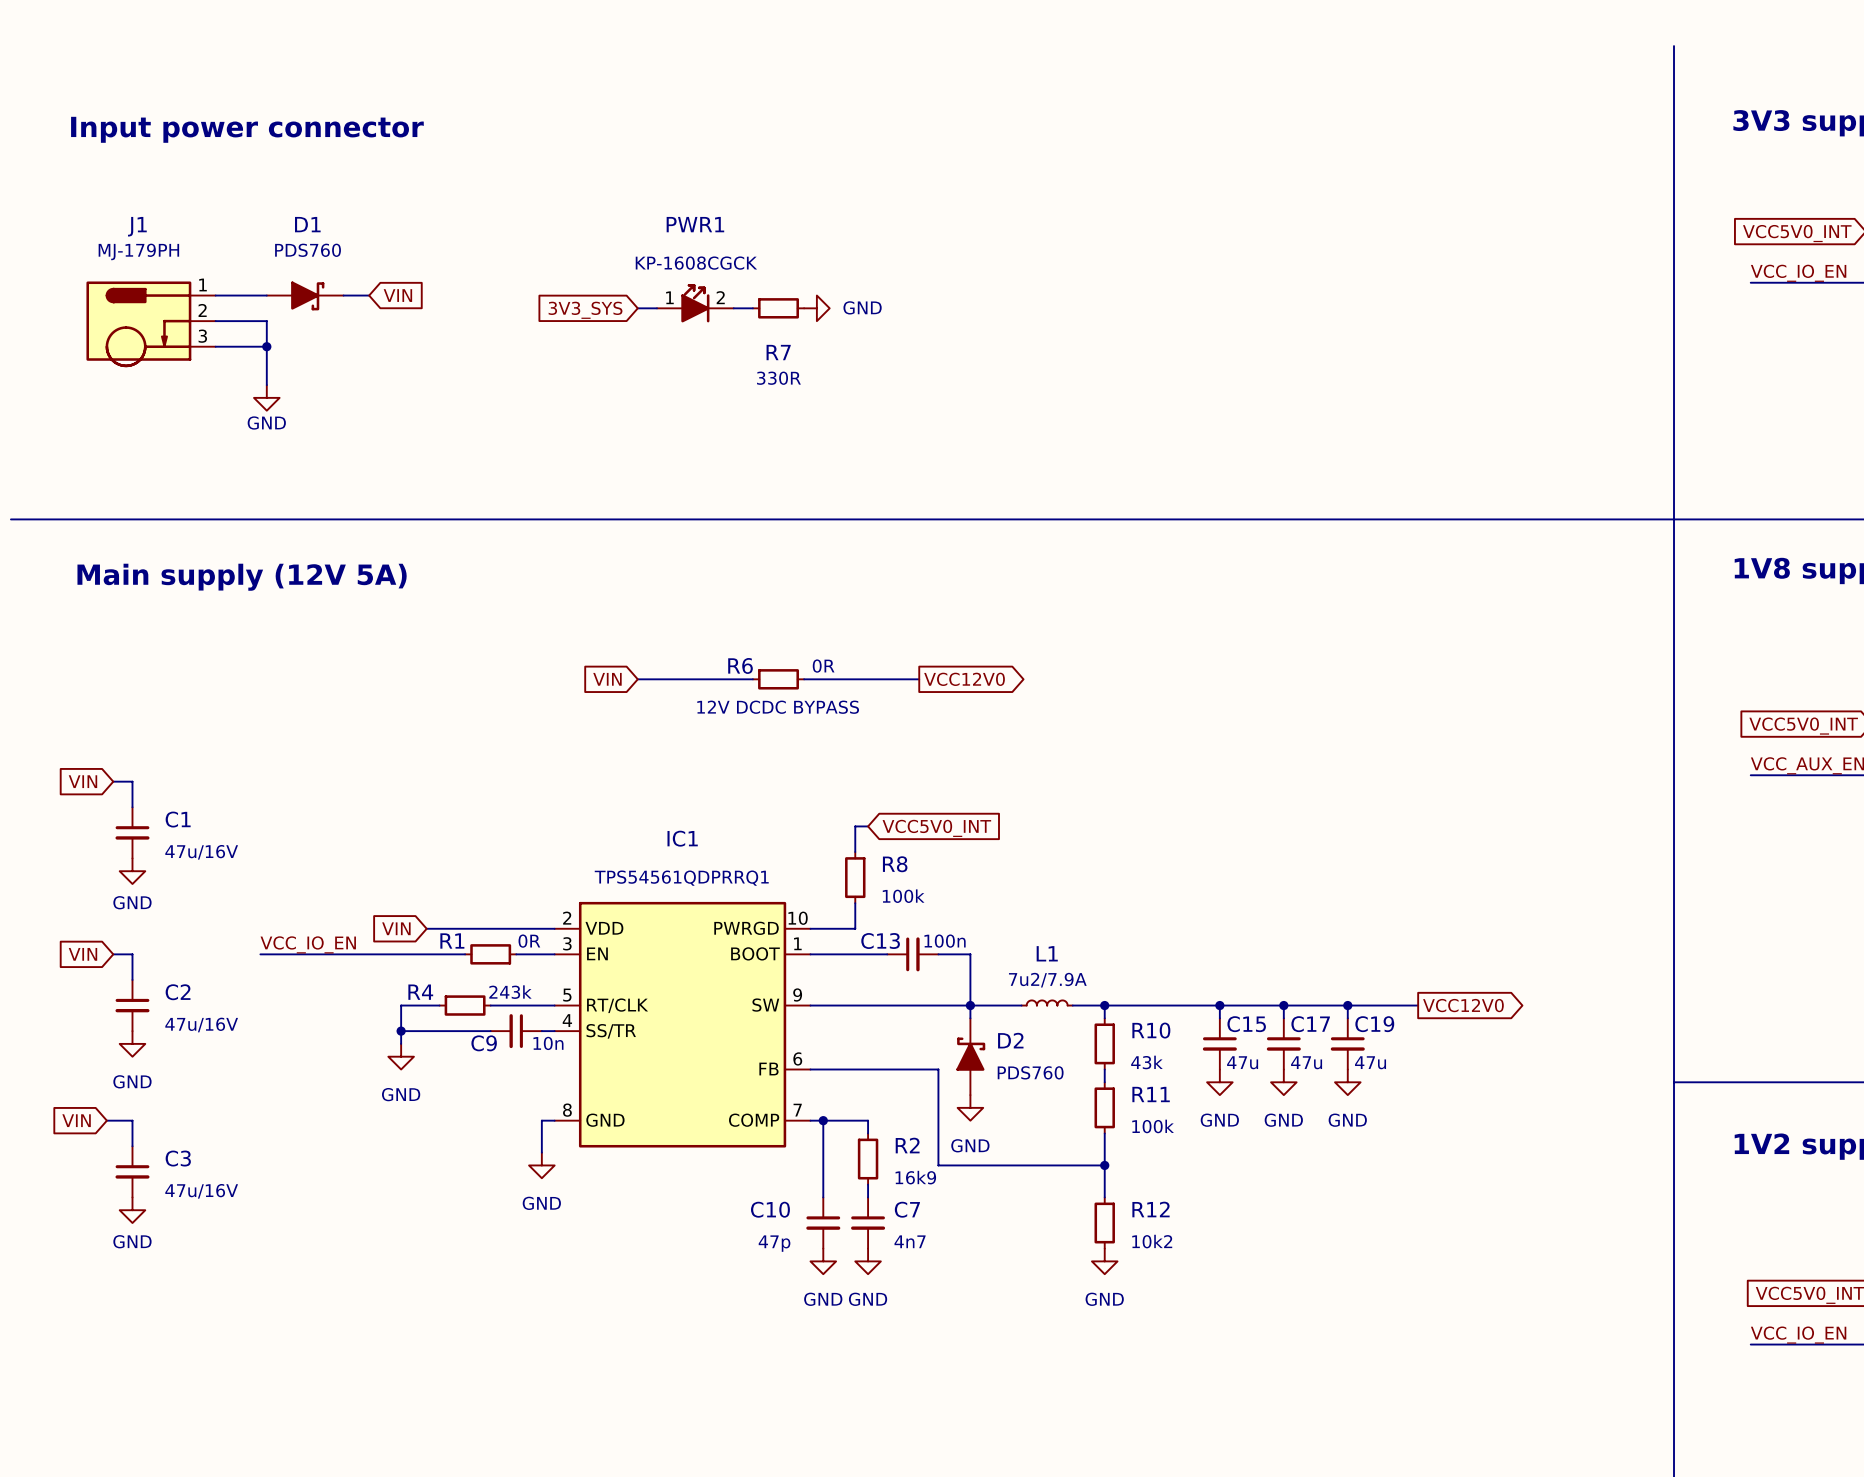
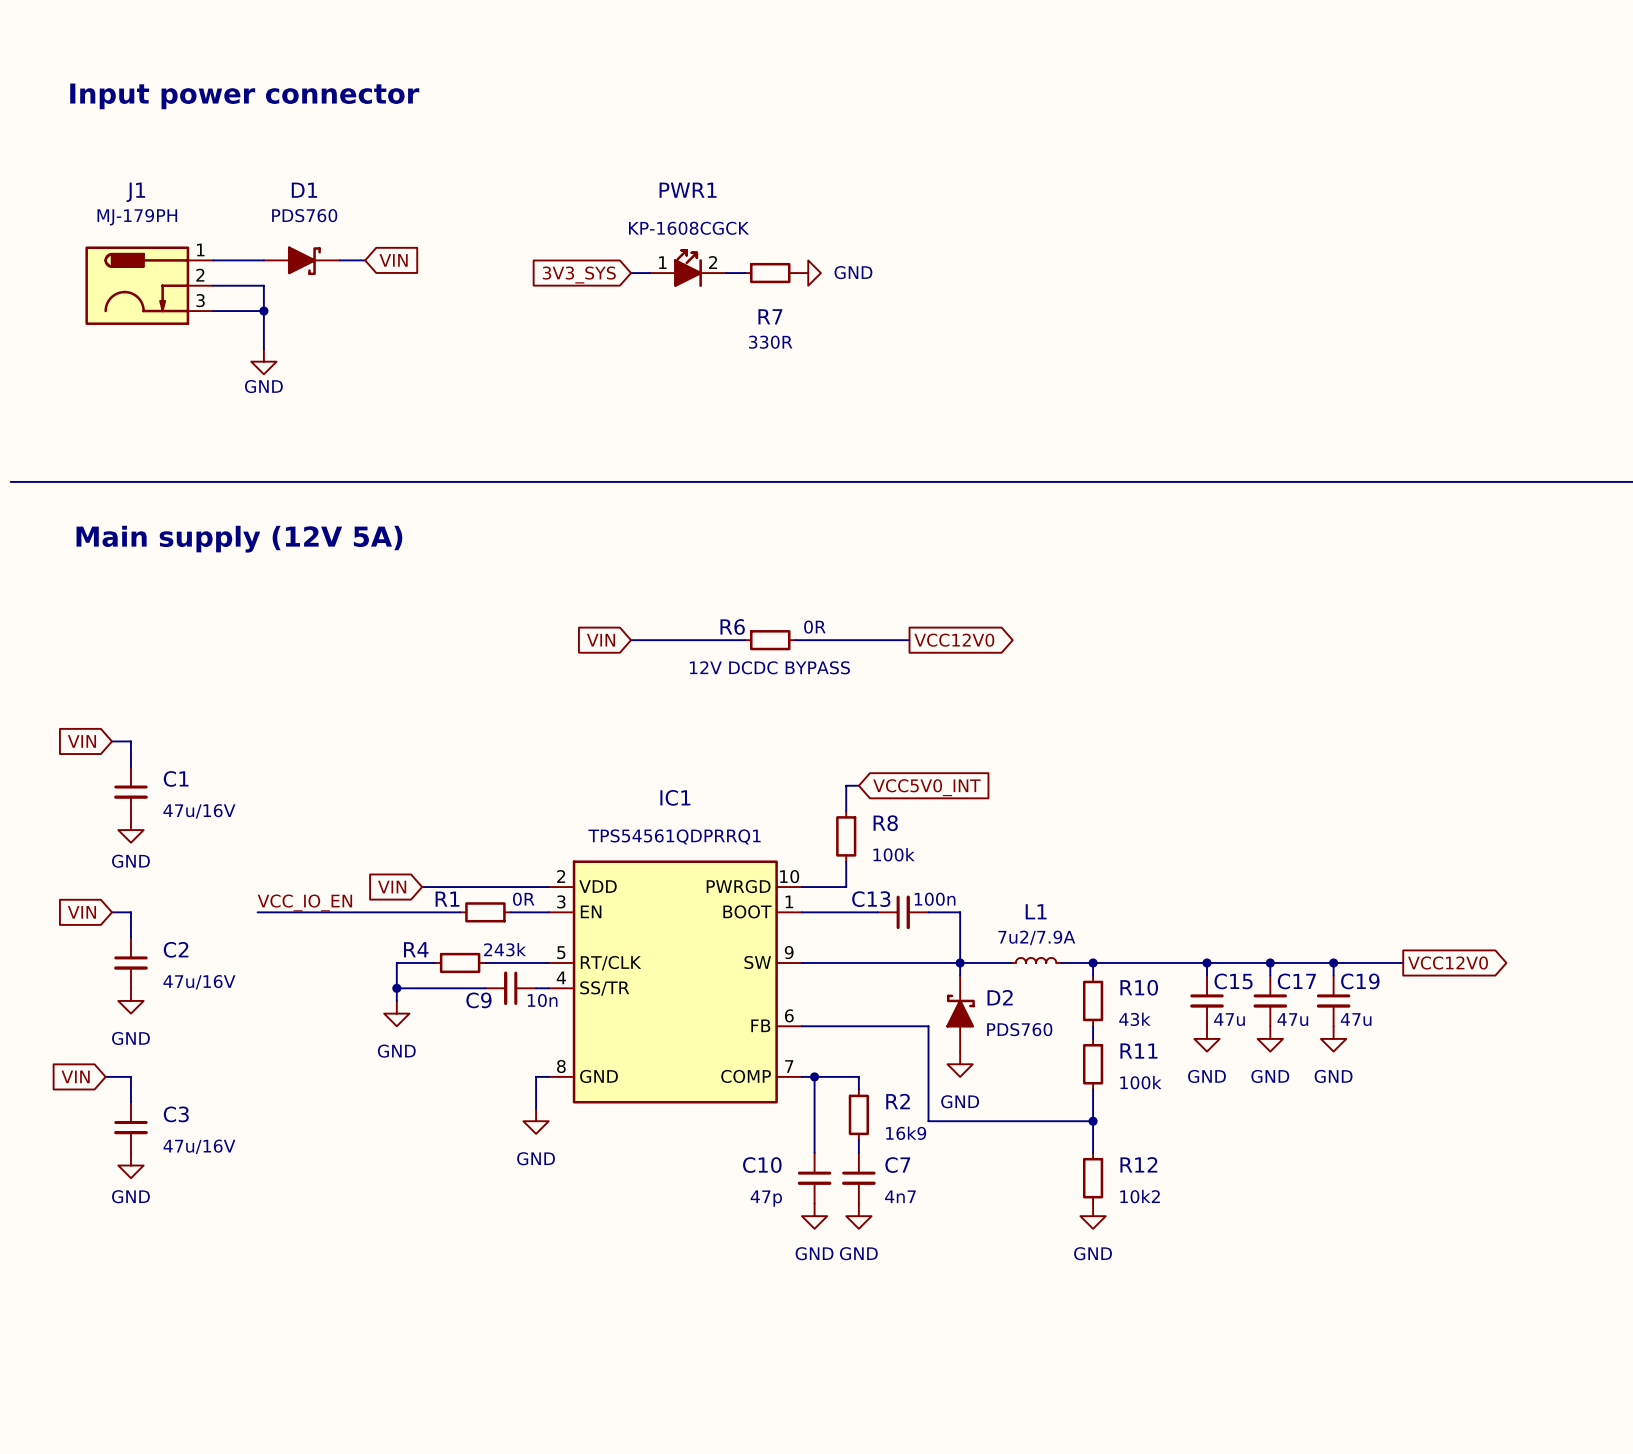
J1 symbol: [86, 281, 216, 368] -> [85, 246, 214, 325]

